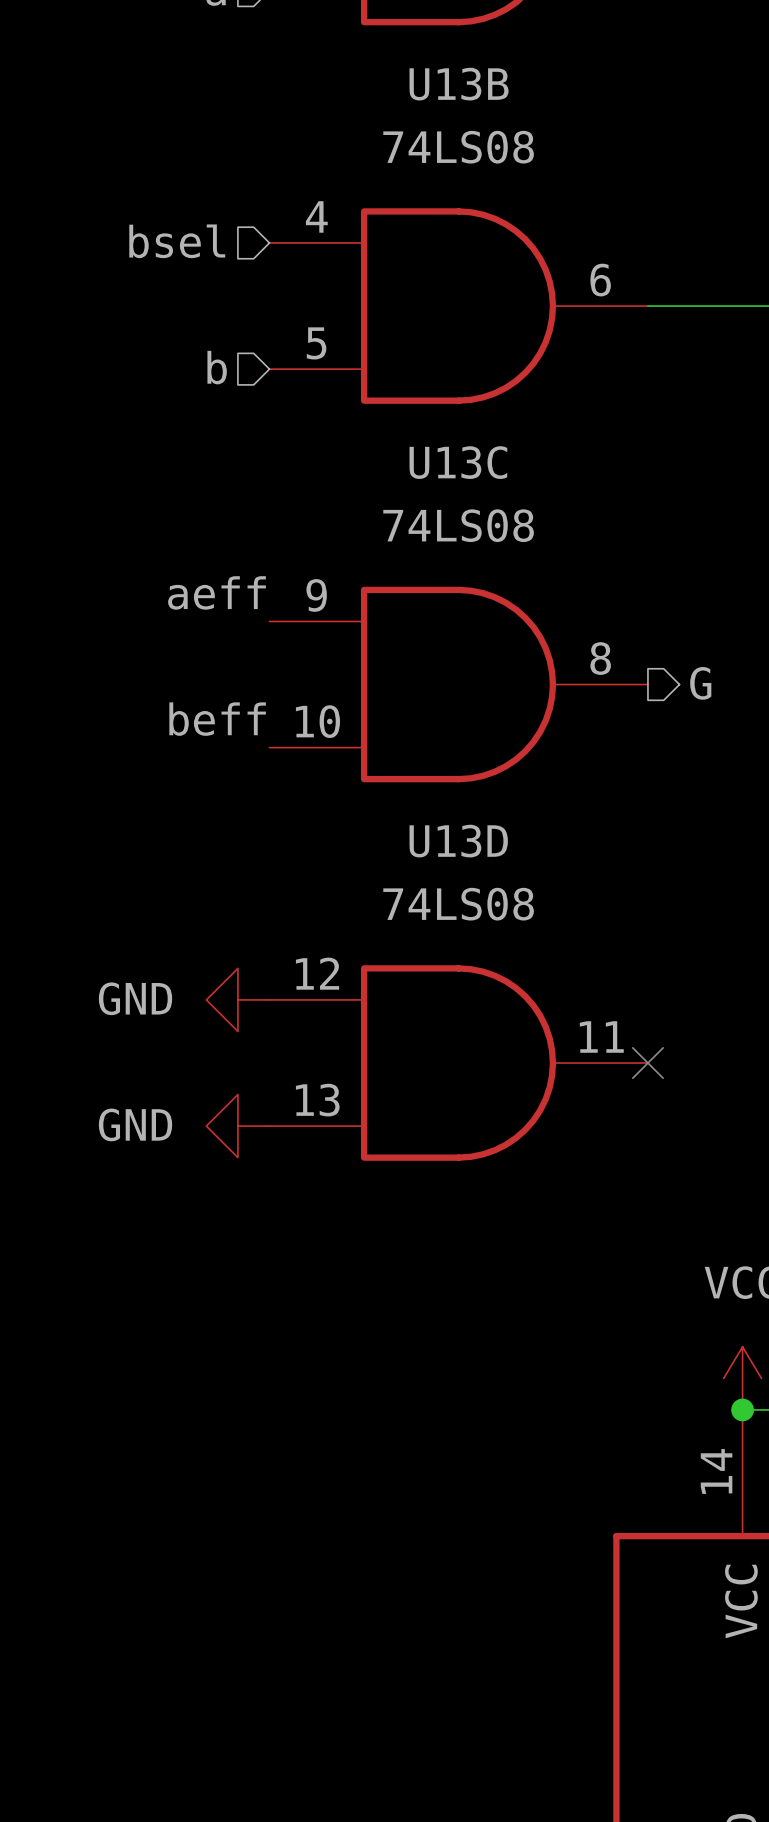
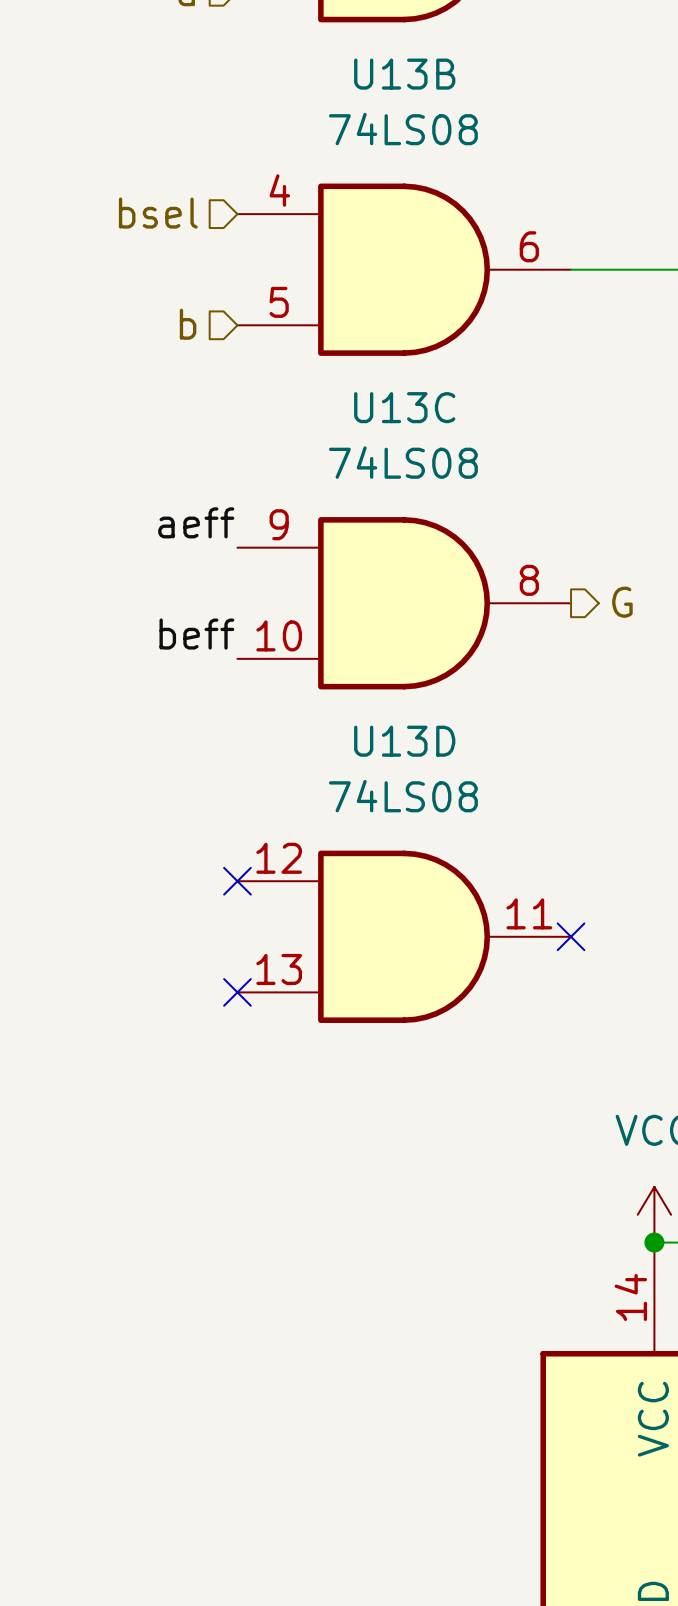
power symbol: GND (237, 999) -> none
no-connect mark: none -> (237, 881)
power symbol: GND (237, 1126) -> none
no-connect mark: none -> (237, 992)

